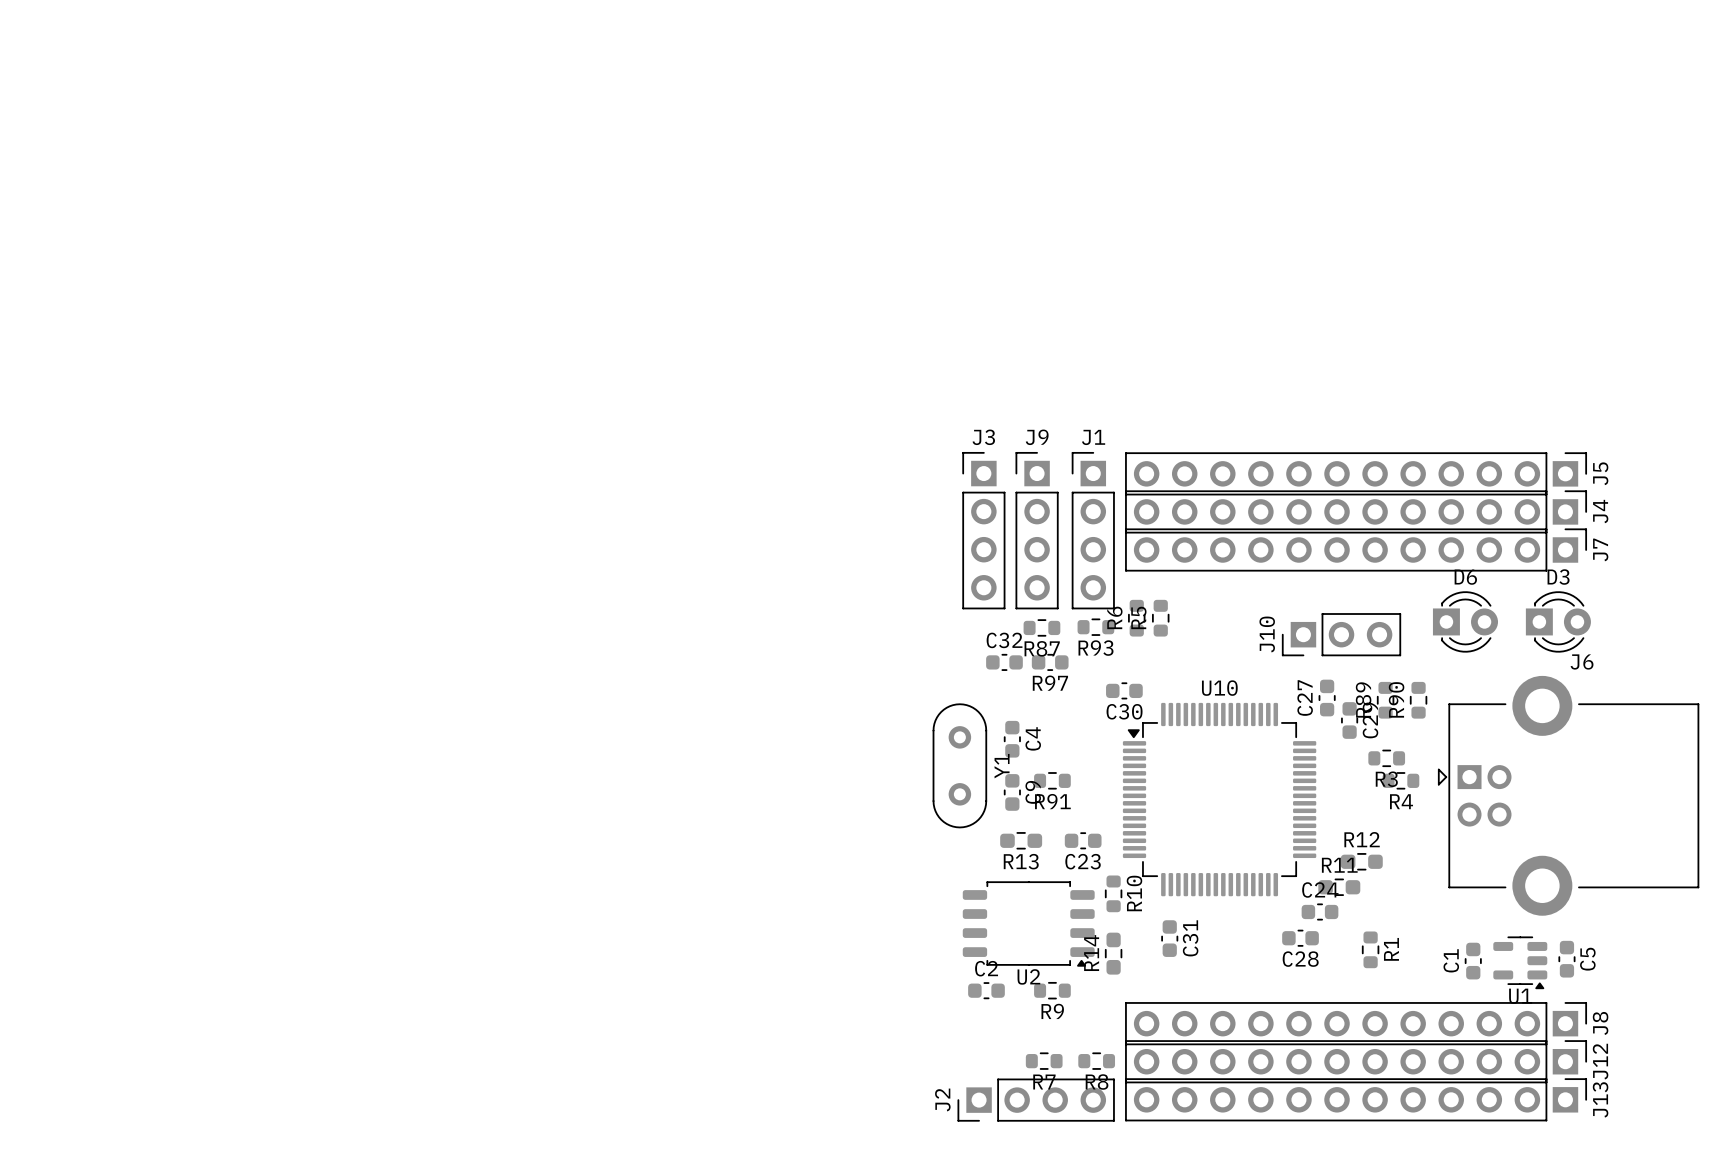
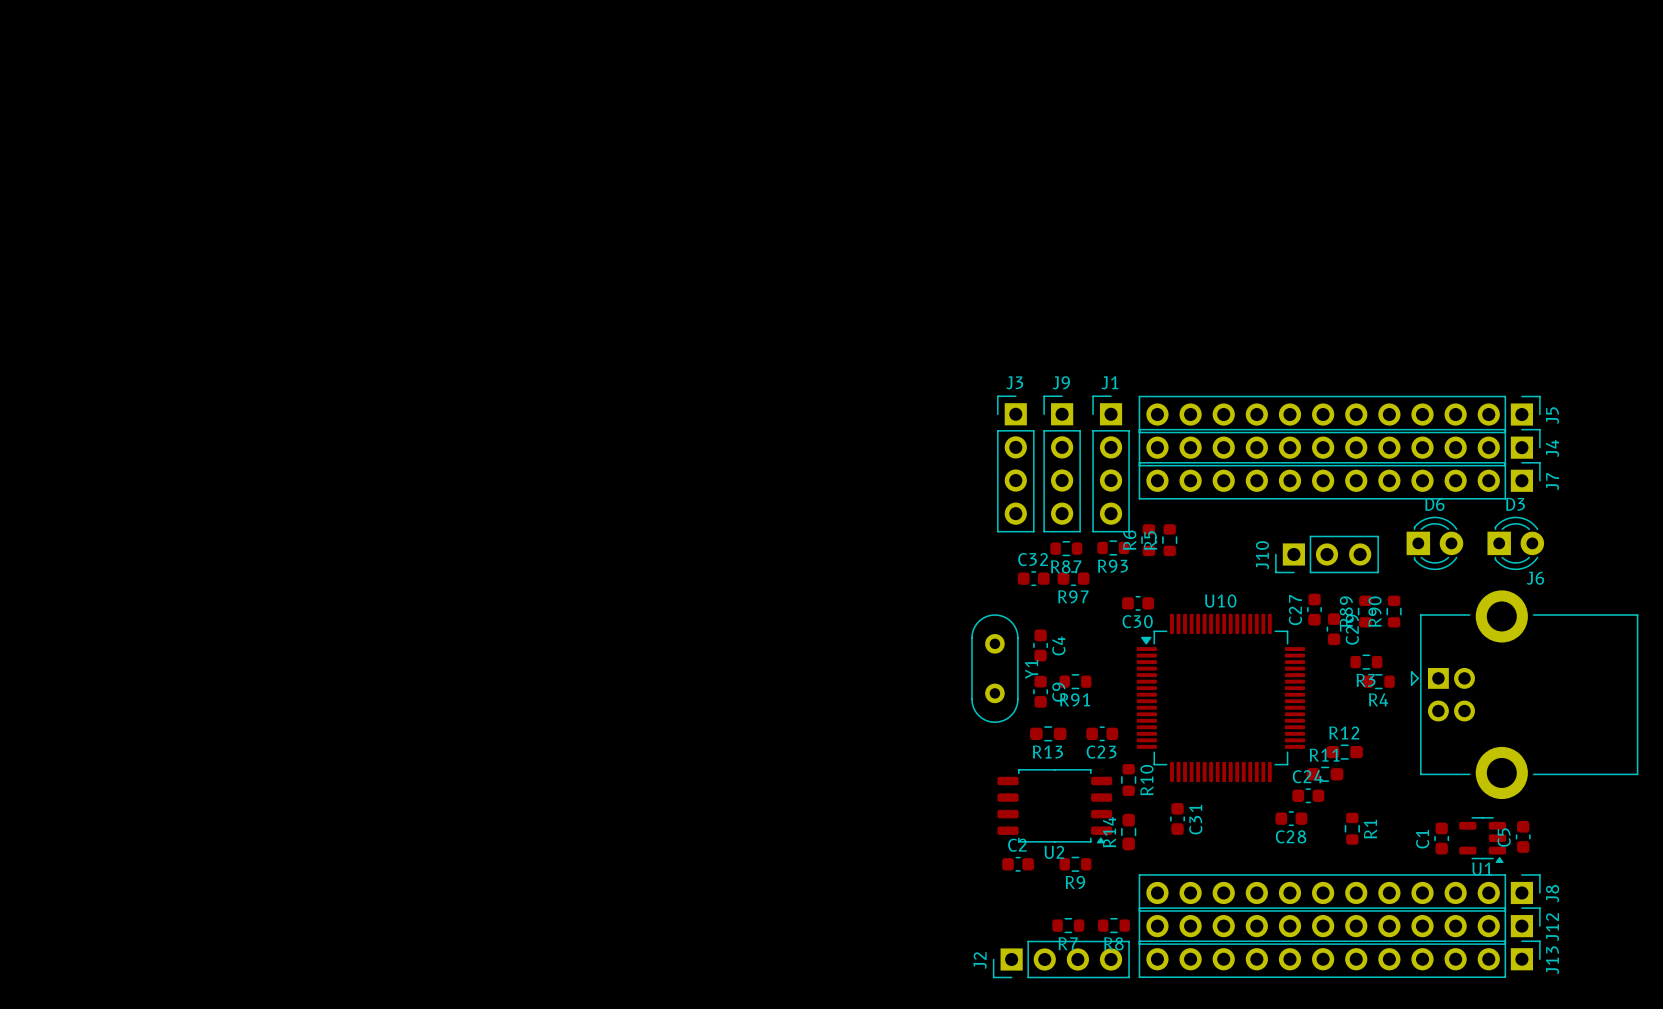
C5 name position: C5 (1587, 959) -> C5 (1504, 837)

